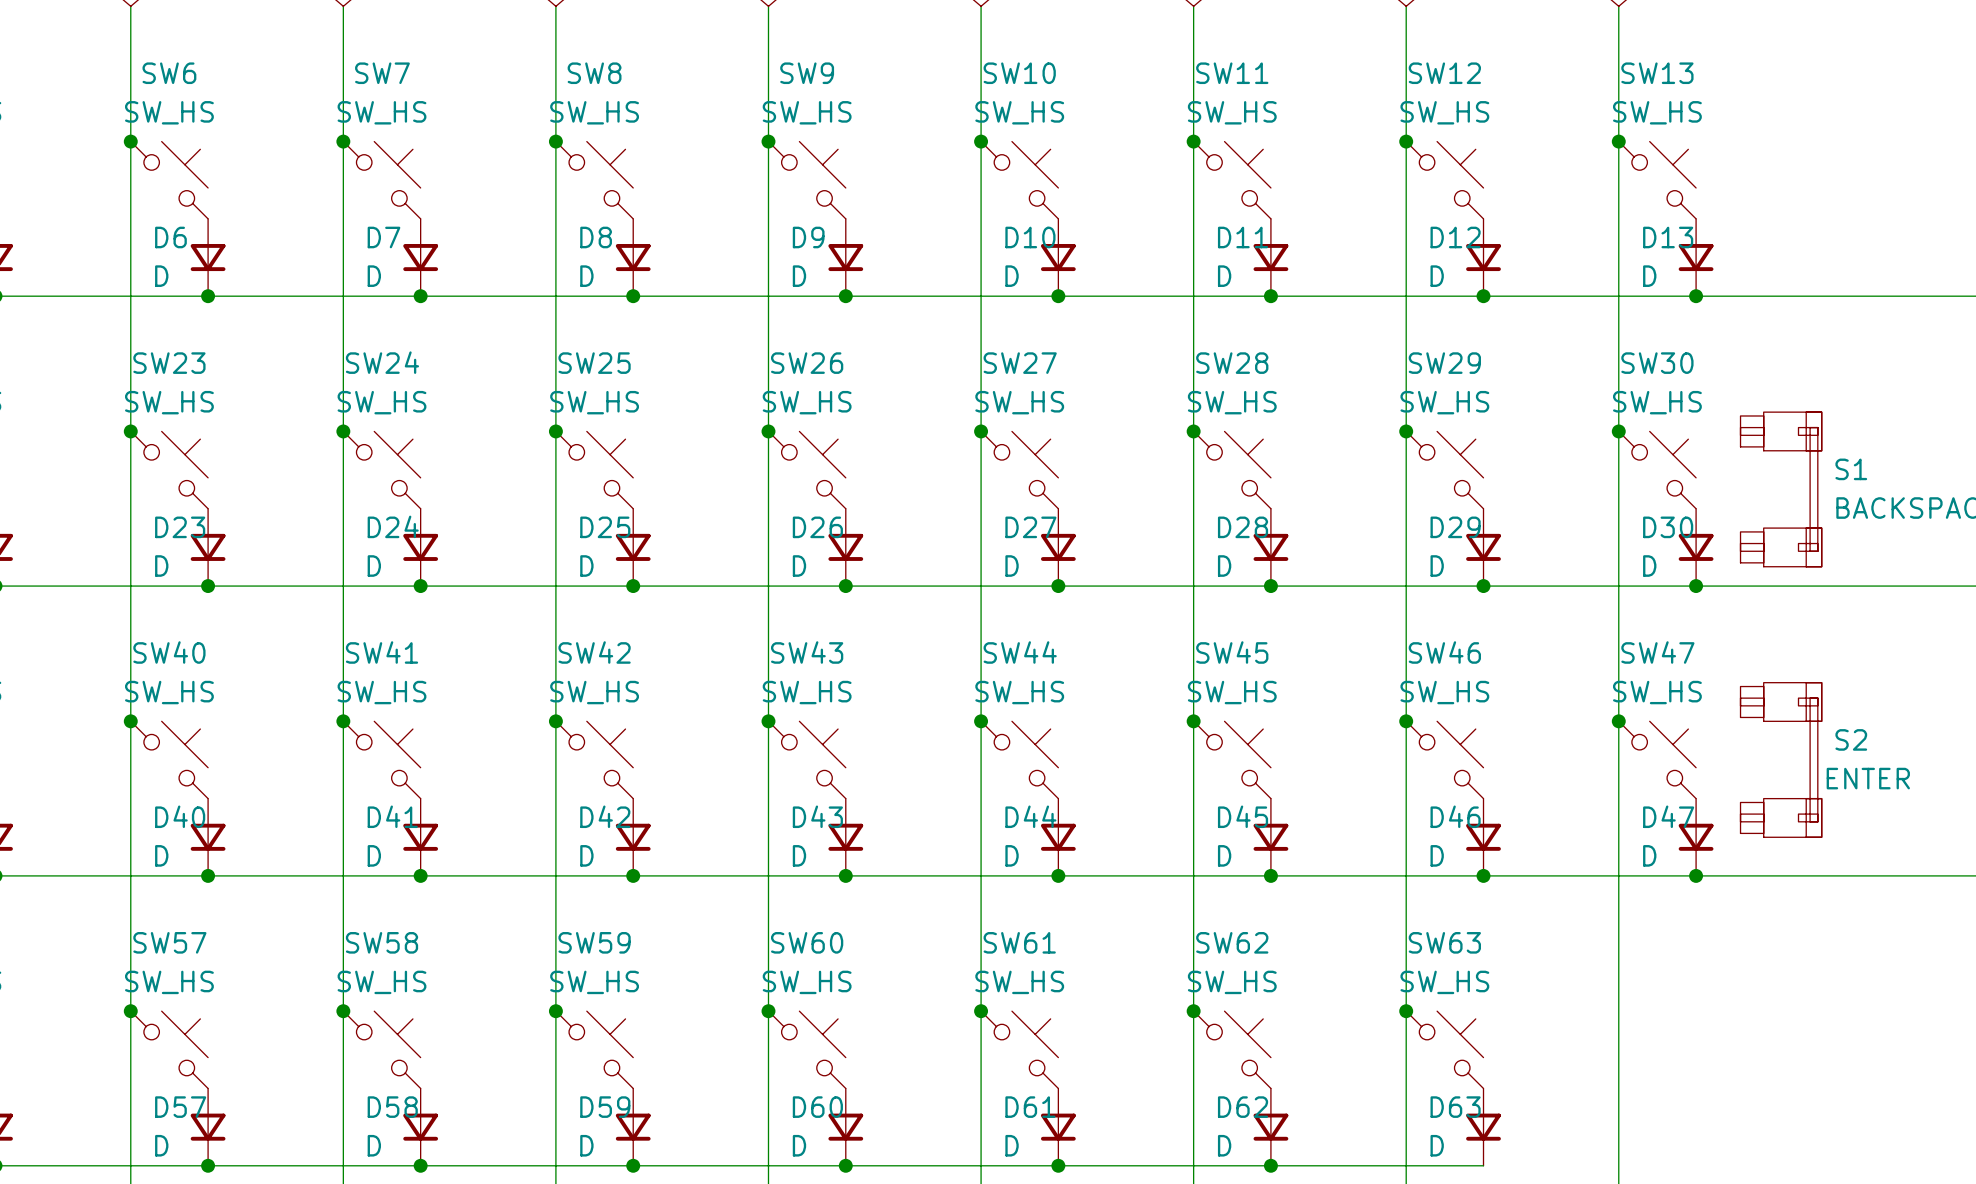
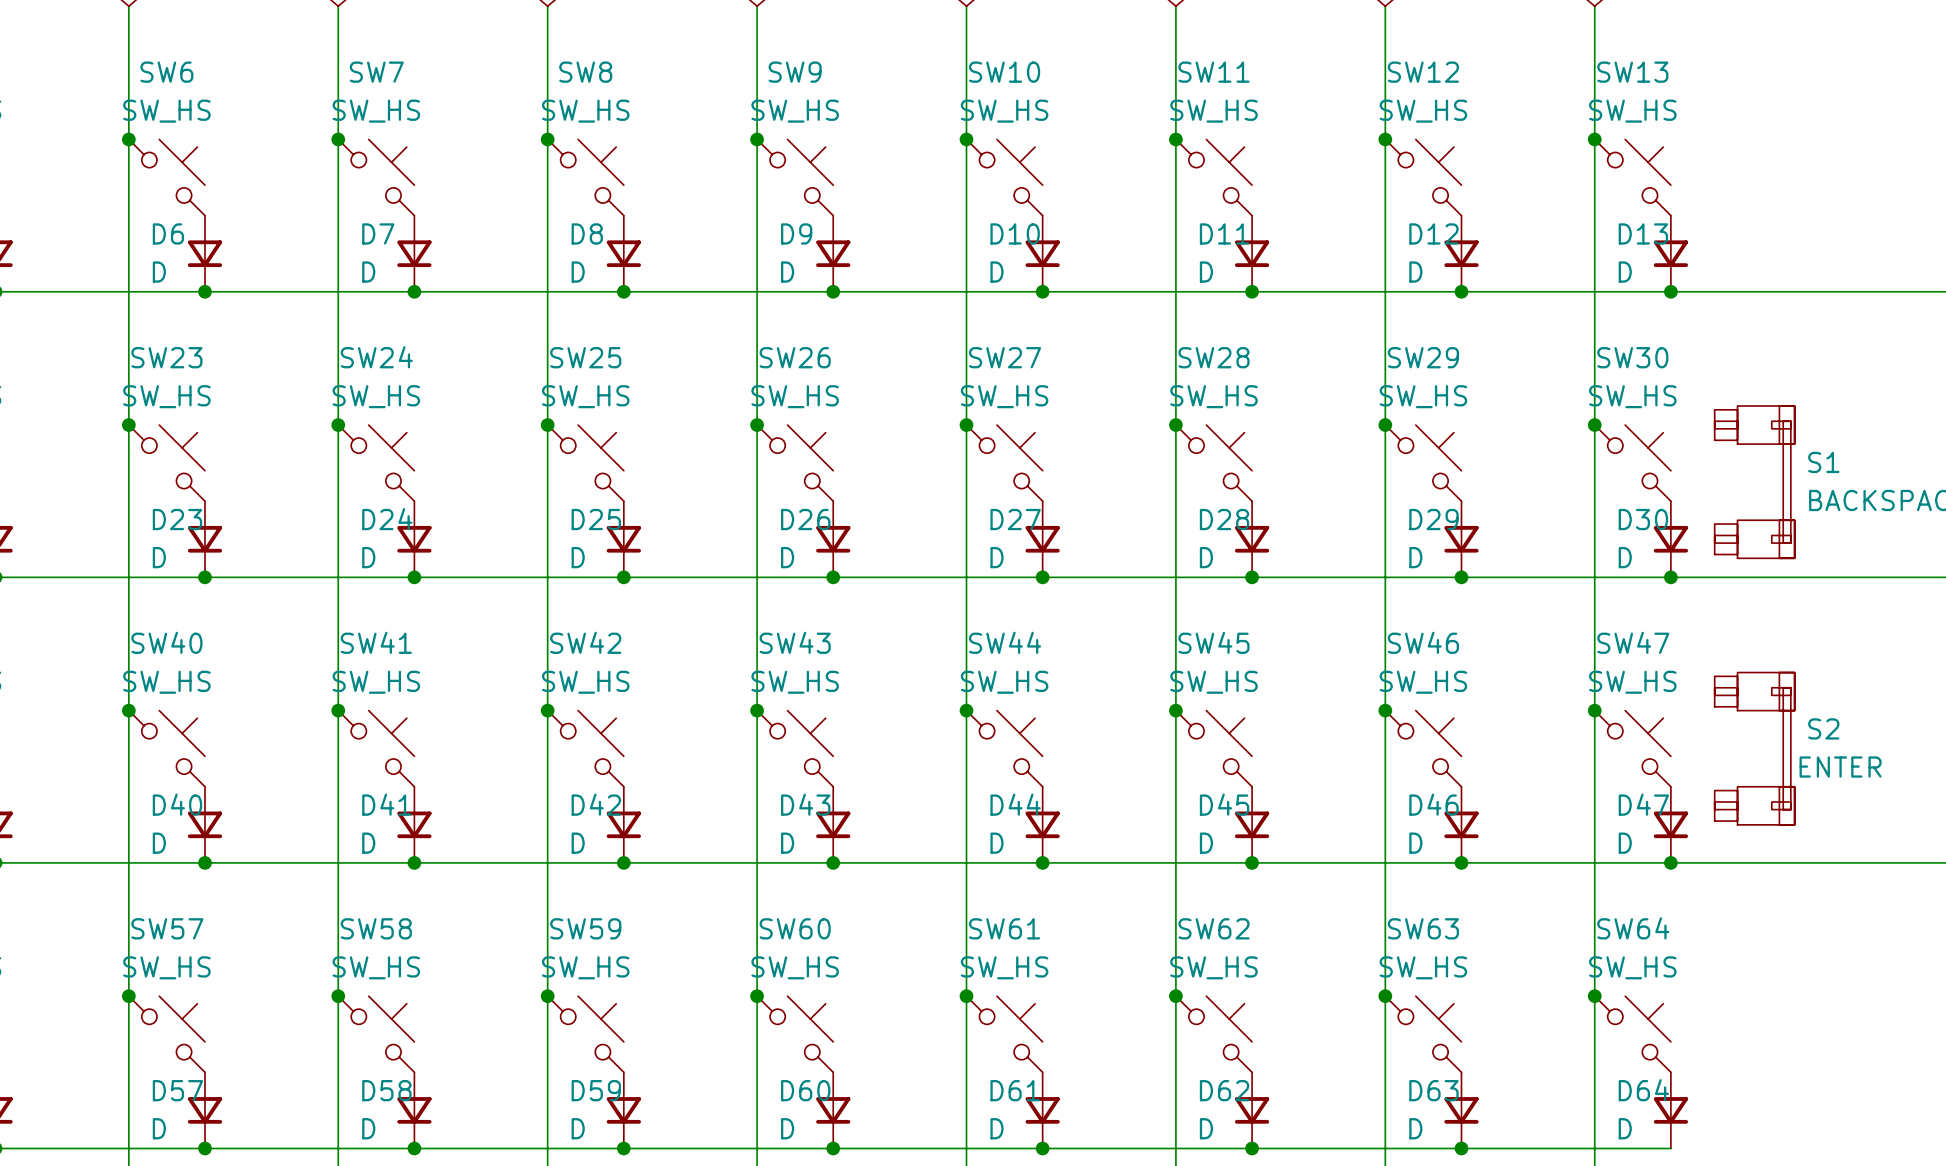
junction: none -> (1594, 996)
SW64: none -> SW_HS (1632, 1034)
D64: none -> D (1670, 1110)
wire: none -> (1461, 1148) (1670, 1148)
junction: none -> (1461, 1148)

